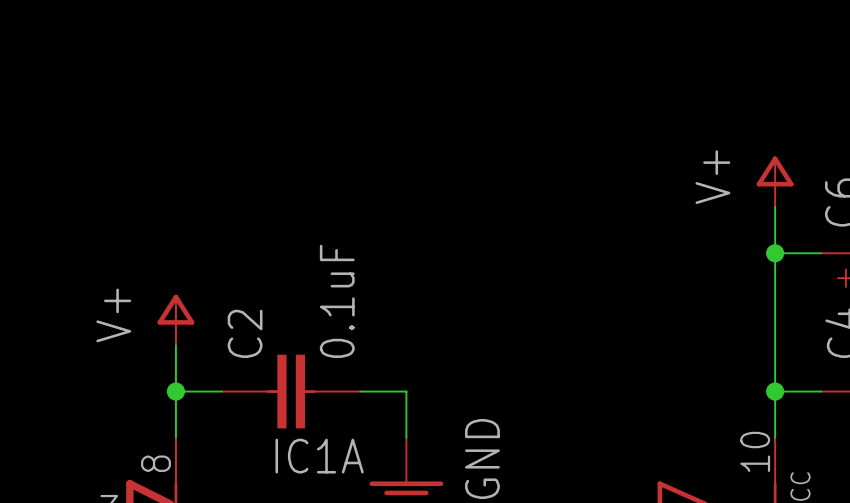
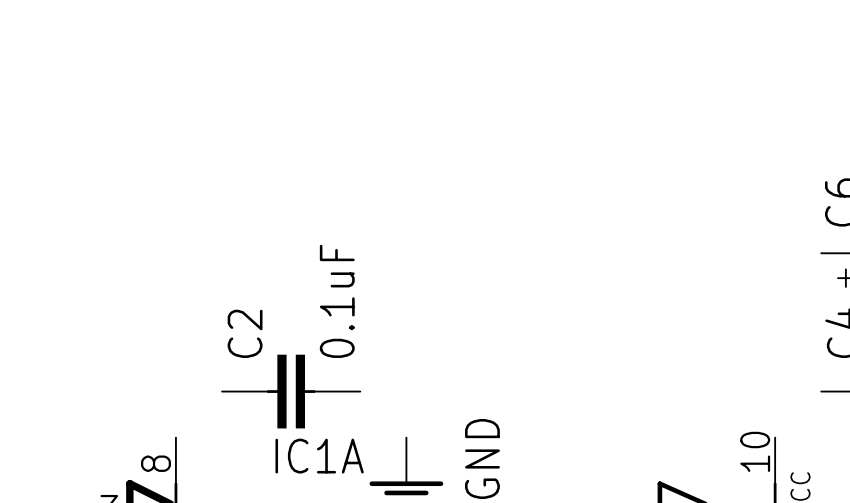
power symbol: V+ (775, 181) -> none
wire: (775, 207) (775, 437) -> none
wire: (775, 253) (821, 253) -> none
junction: (775, 253) -> none
power symbol: V+ (175, 320) -> none
wire: (175, 345) (175, 437) -> none
wire: (175, 391) (222, 391) -> none
junction: (175, 391) -> none
wire: (360, 391) (406, 391) (406, 437) -> none
wire: (775, 391) (821, 391) -> none
junction: (775, 391) -> none

